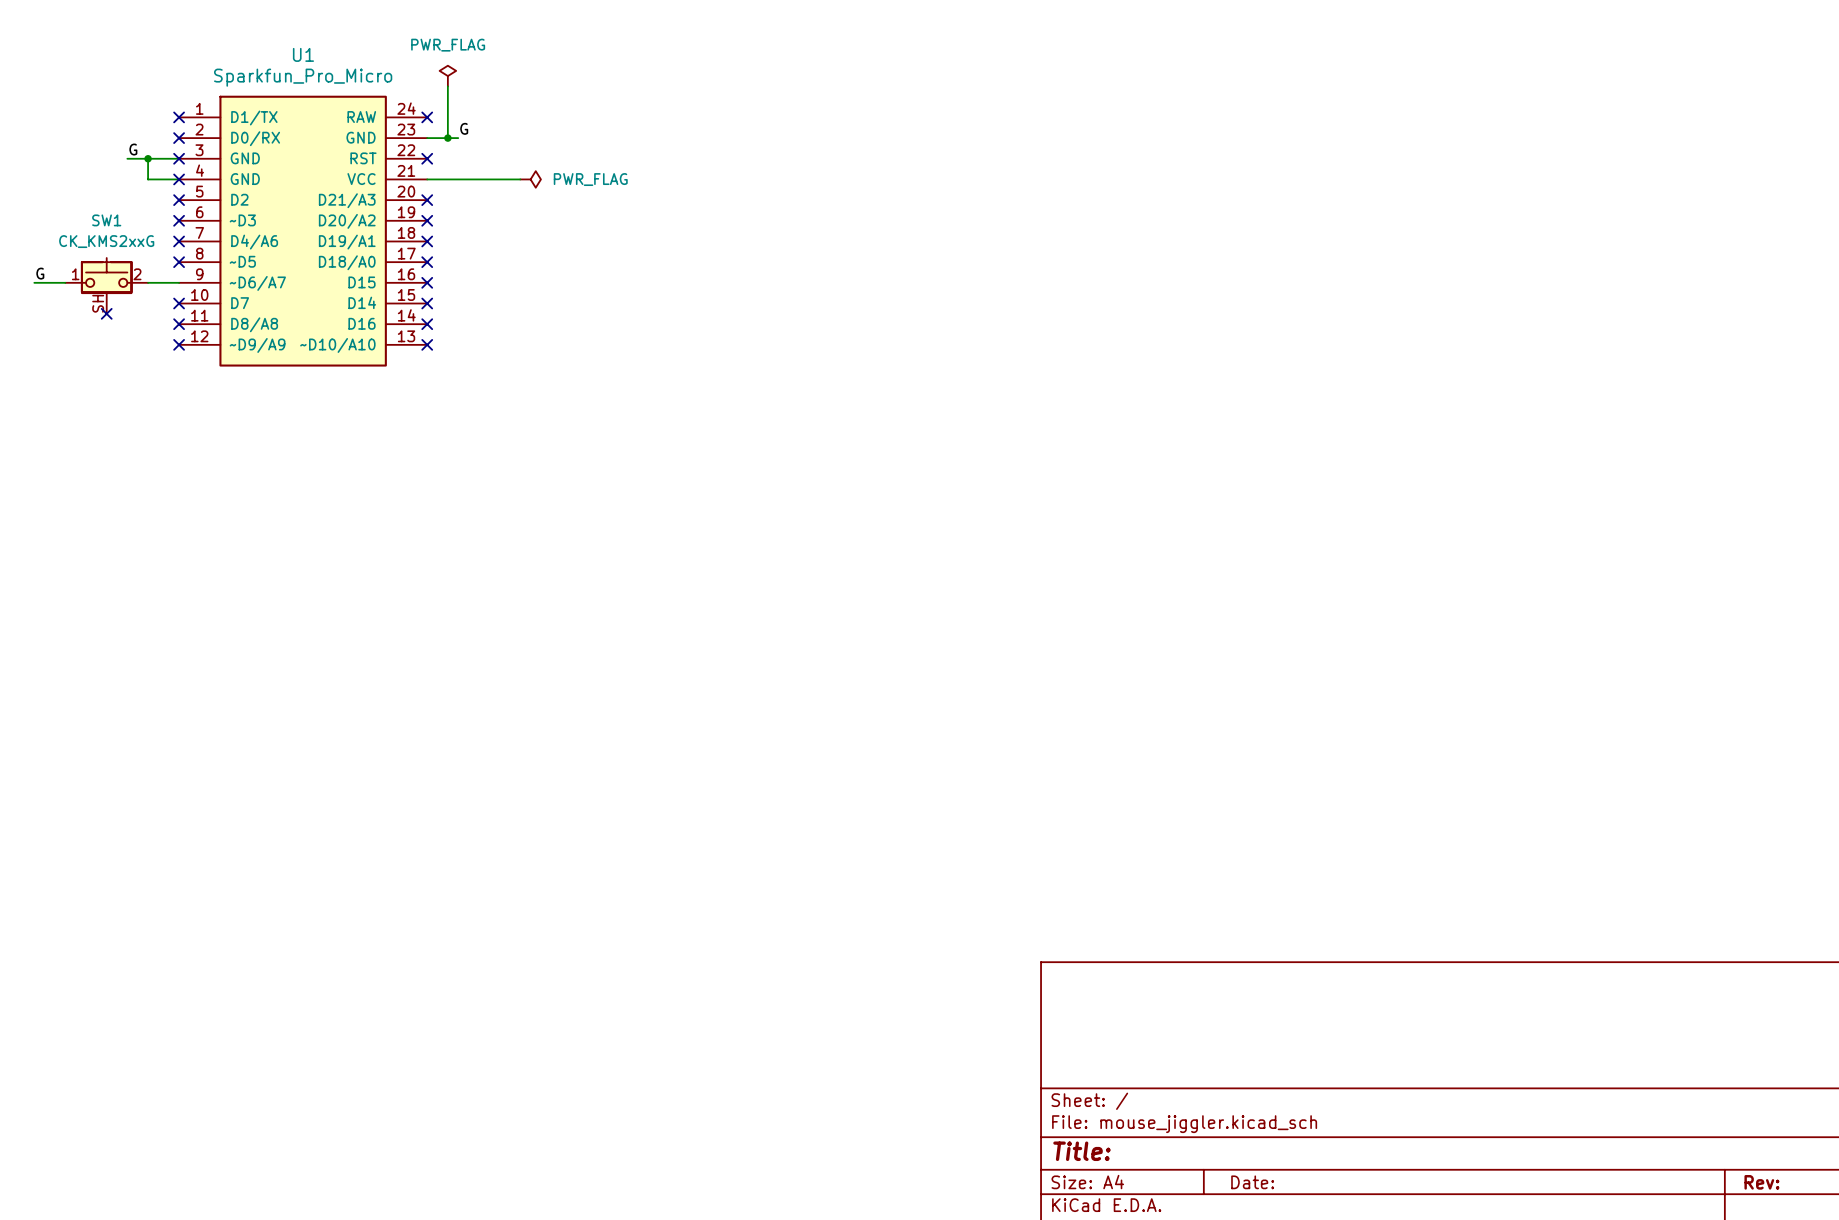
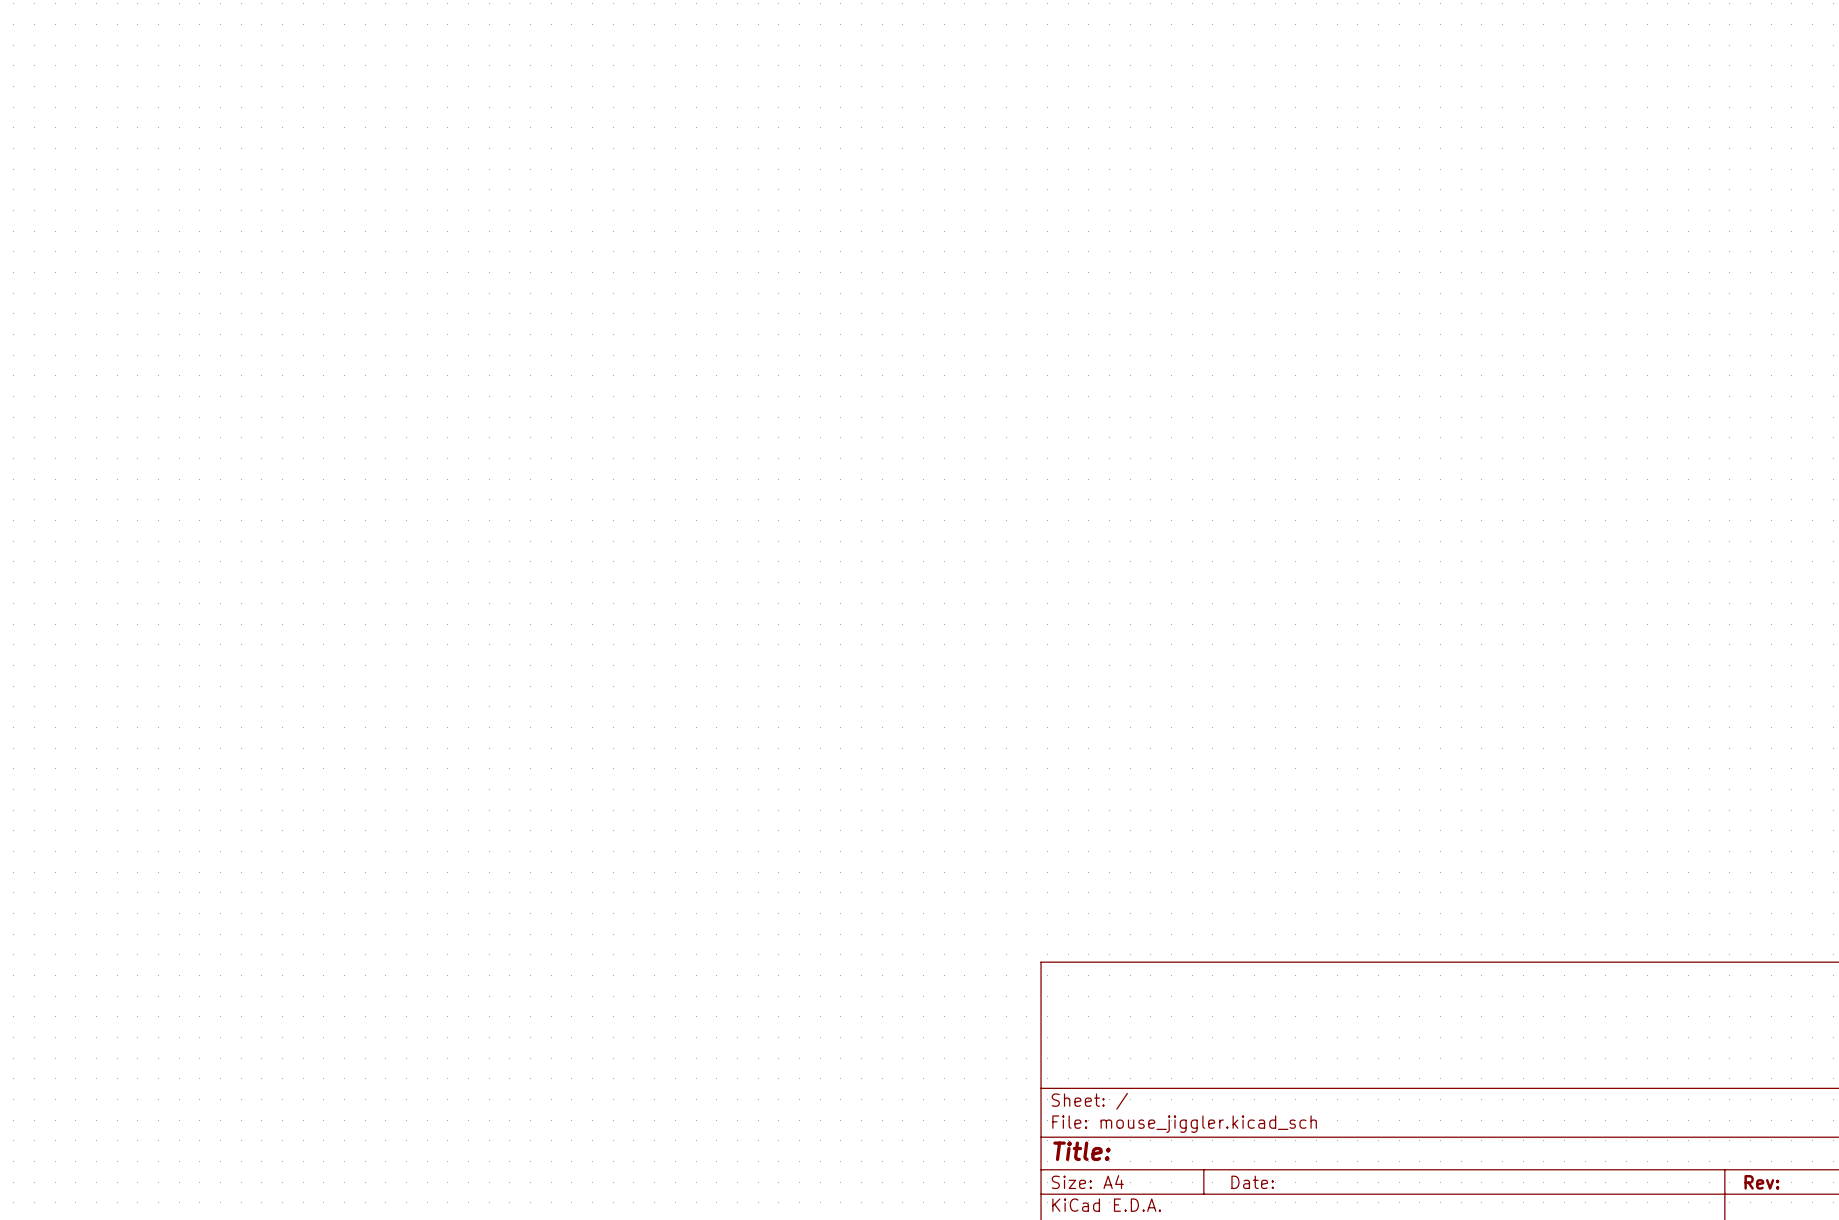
power symbol: PWR_FLAG (447, 76) -> none
wire: (447, 86) (447, 138) -> none
no-connect mark: (179, 117) -> none
no-connect mark: (427, 117) -> none
label: G (464, 128) -> none
no-connect mark: (179, 138) -> none
wire: (427, 138) (458, 138) -> none
junction: (447, 138) -> none
label: G (133, 149) -> none
wire: (127, 158) (179, 158) -> none
wire: (148, 158) (148, 179) (179, 179) -> none
junction: (148, 158) -> none
no-connect mark: (179, 158) -> none
no-connect mark: (427, 158) -> none
no-connect mark: (179, 179) -> none
wire: (427, 179) (520, 179) -> none
power symbol: PWR_FLAG (530, 179) -> none
no-connect mark: (179, 200) -> none
no-connect mark: (427, 200) -> none
no-connect mark: (179, 220) -> none
no-connect mark: (427, 220) -> none
U1: Sparkfun_Pro_Micro (303, 231) -> none
no-connect mark: (179, 241) -> none
no-connect mark: (427, 241) -> none
no-connect mark: (179, 262) -> none
no-connect mark: (427, 262) -> none
label: G (40, 273) -> none
wire: (34, 282) (65, 282) -> none
wire: (148, 282) (179, 282) -> none
no-connect mark: (427, 282) -> none
SW1: CK_KMS2xxG (106, 285) -> none
no-connect mark: (179, 303) -> none
no-connect mark: (427, 303) -> none
no-connect mark: (106, 313) -> none
no-connect mark: (179, 324) -> none
no-connect mark: (427, 324) -> none
no-connect mark: (179, 344) -> none
no-connect mark: (427, 344) -> none

